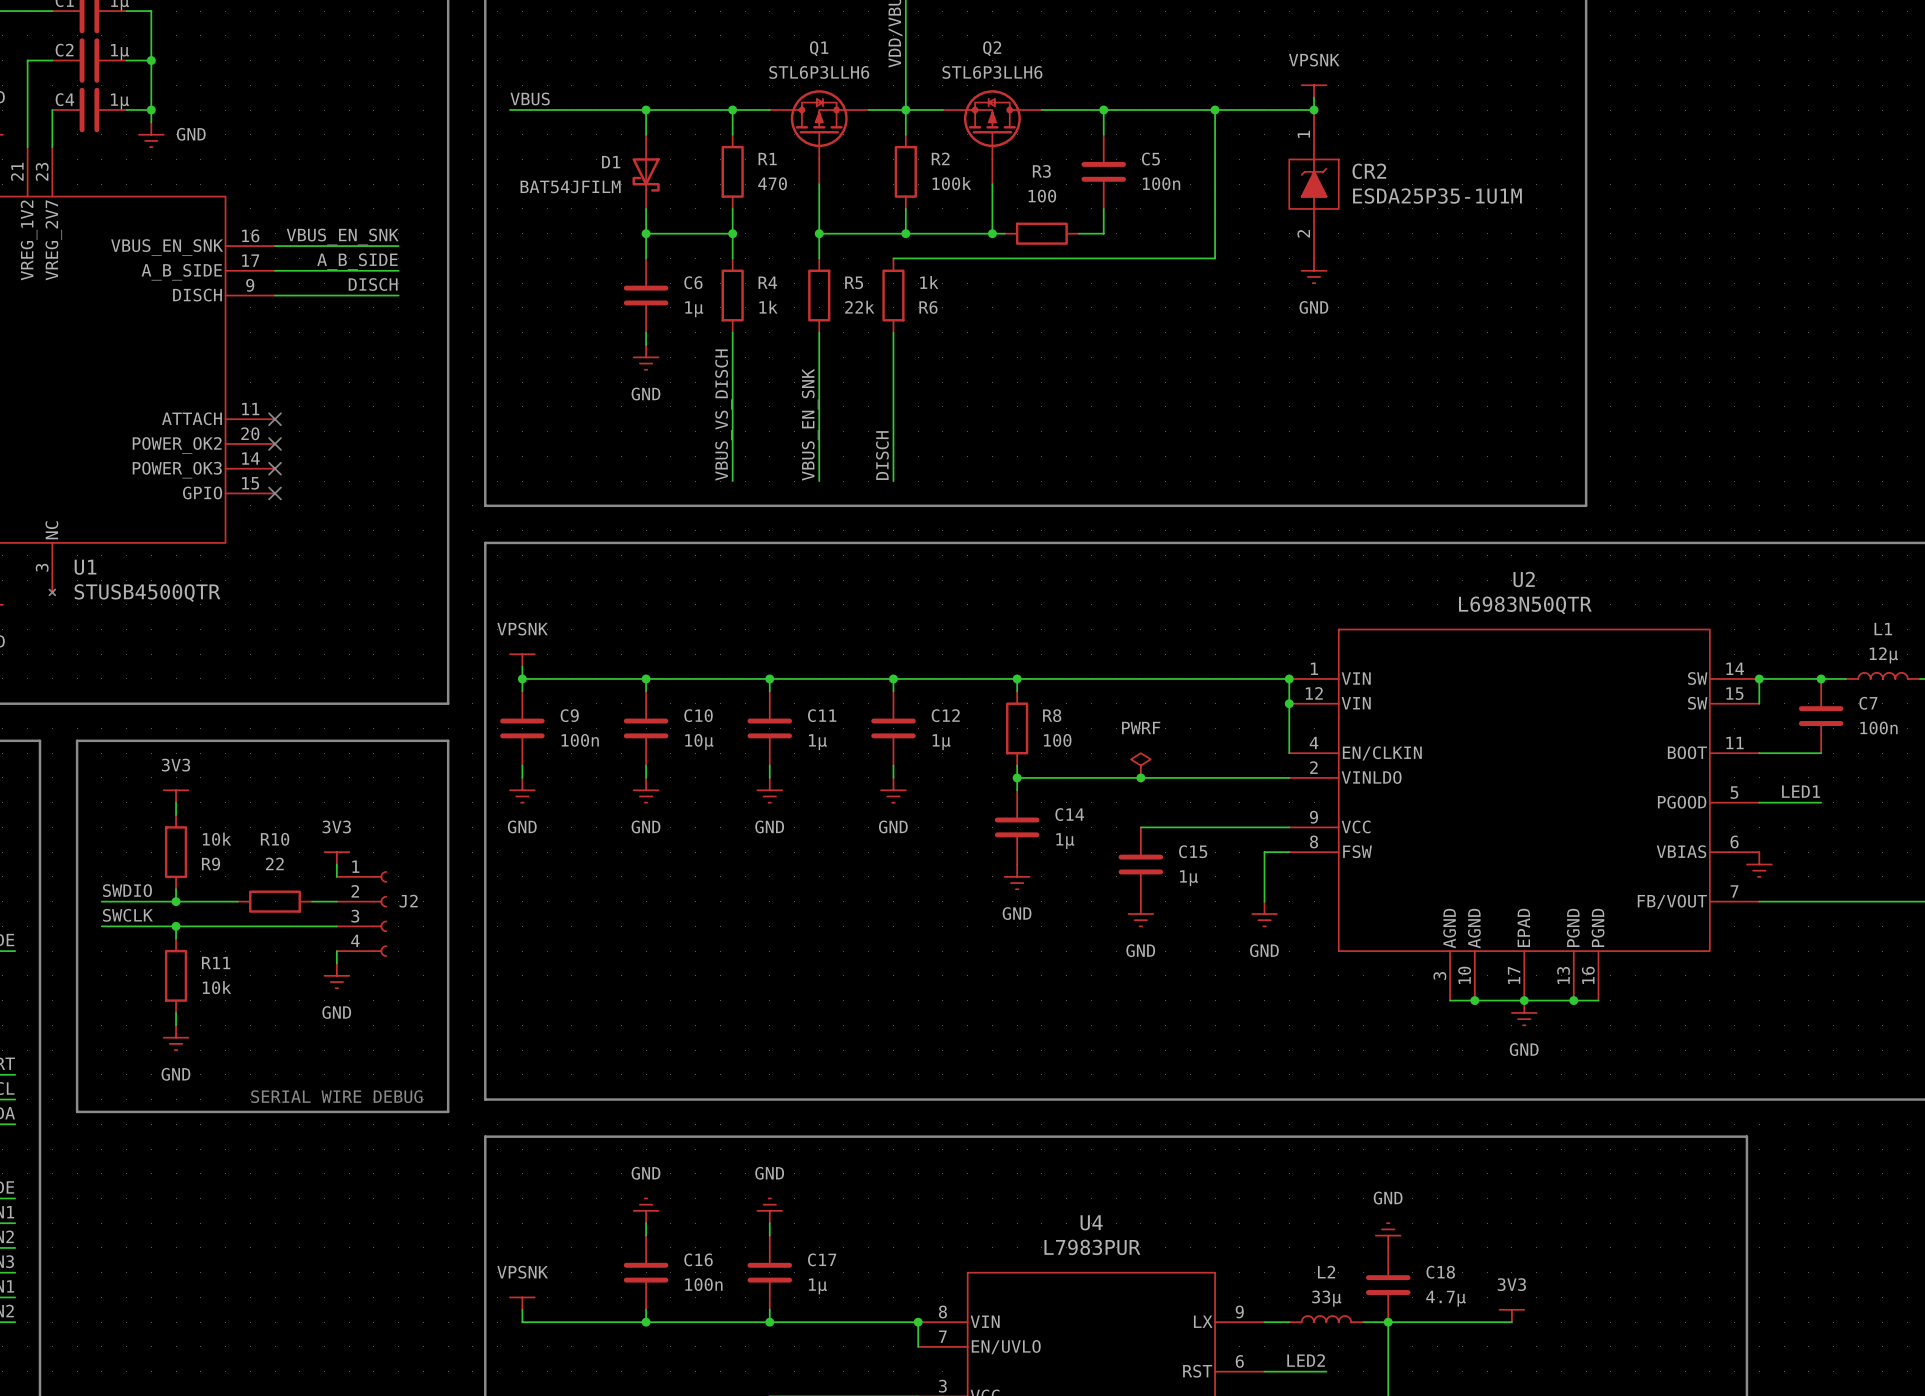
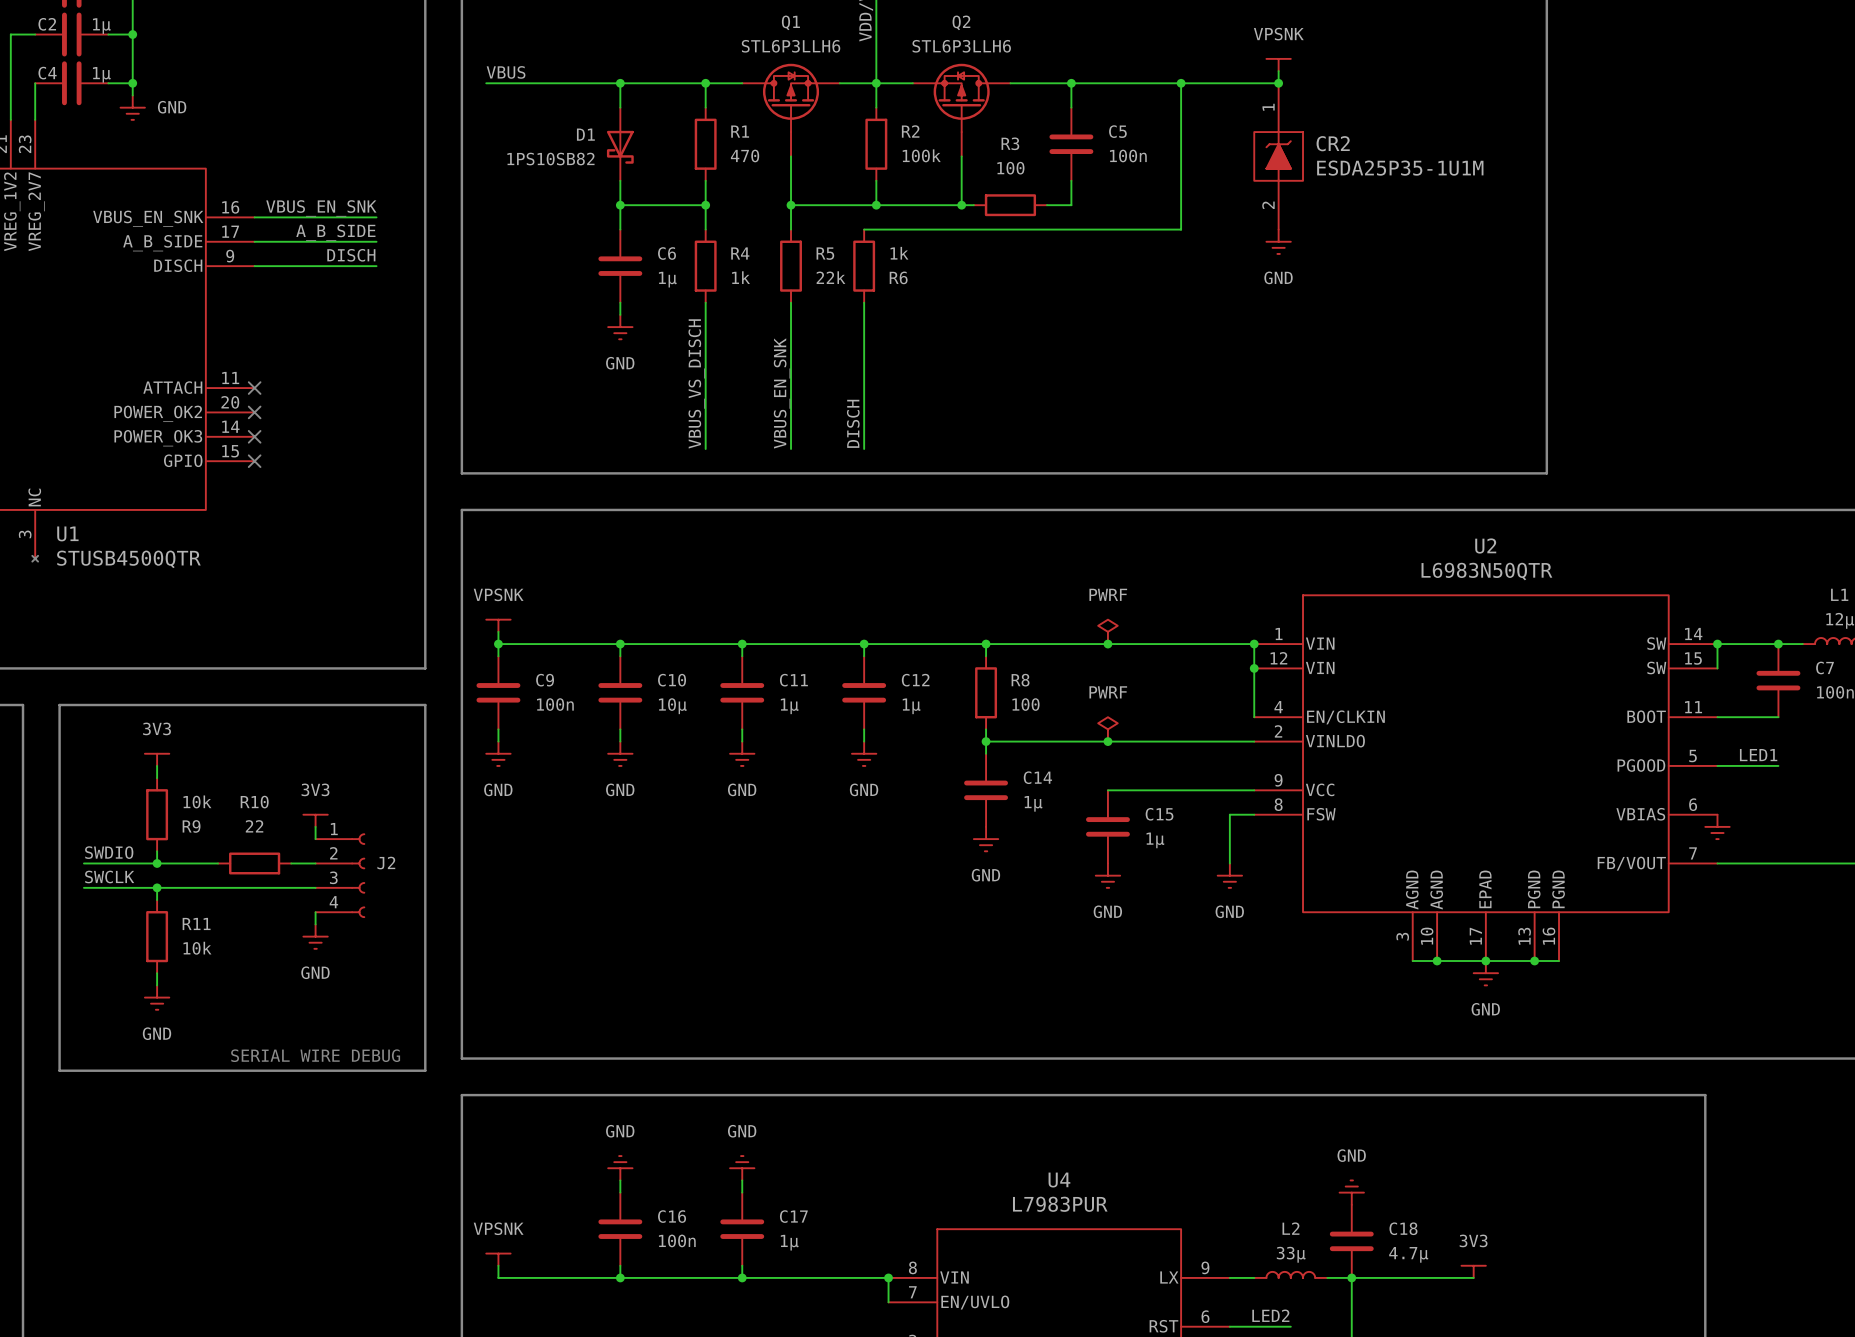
D1 value: BAT54JFILM (570, 186) -> 1PS10SB82 (550, 159)
power symbol: none -> PWRF (1107, 631)
junction: none -> (1107, 644)

